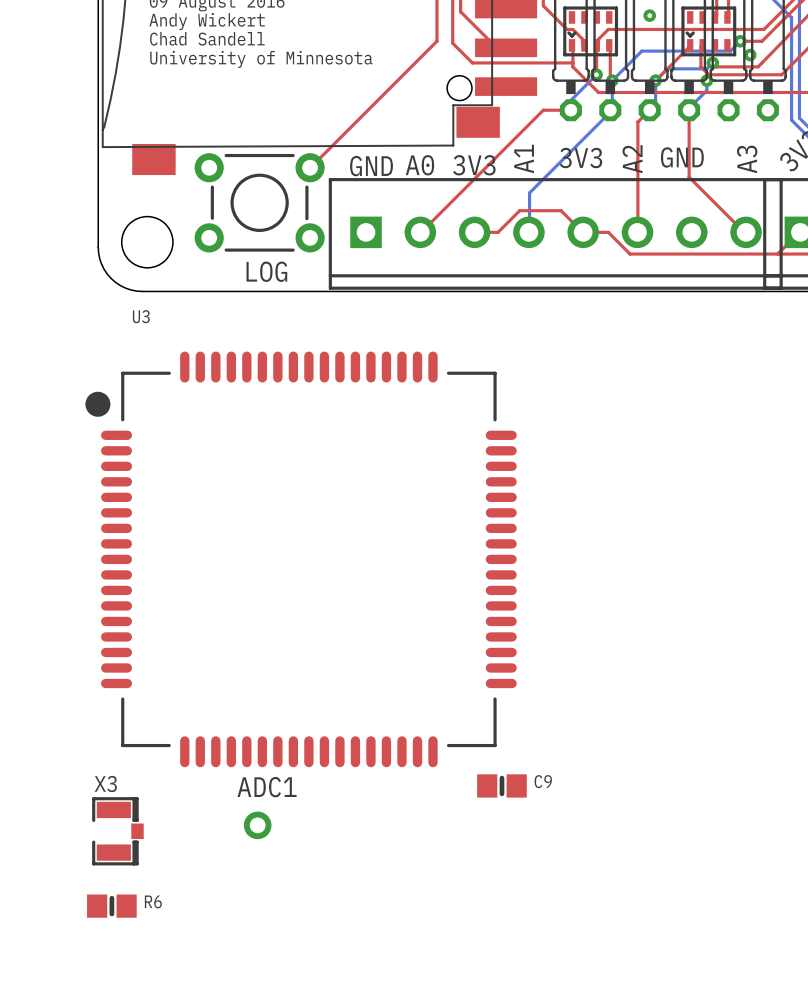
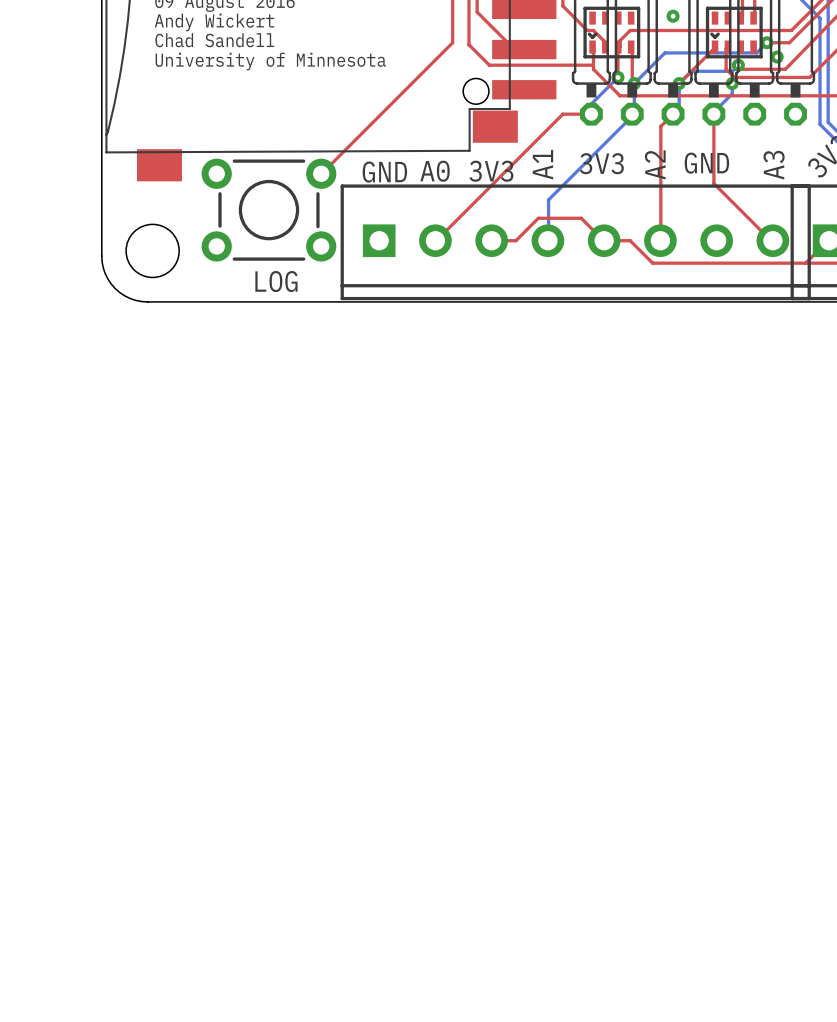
U3: (301, 559) -> none
C9: (501, 785) -> none
ADC1: (257, 825) -> none
X3: (117, 831) -> none
R6: (111, 906) -> none

